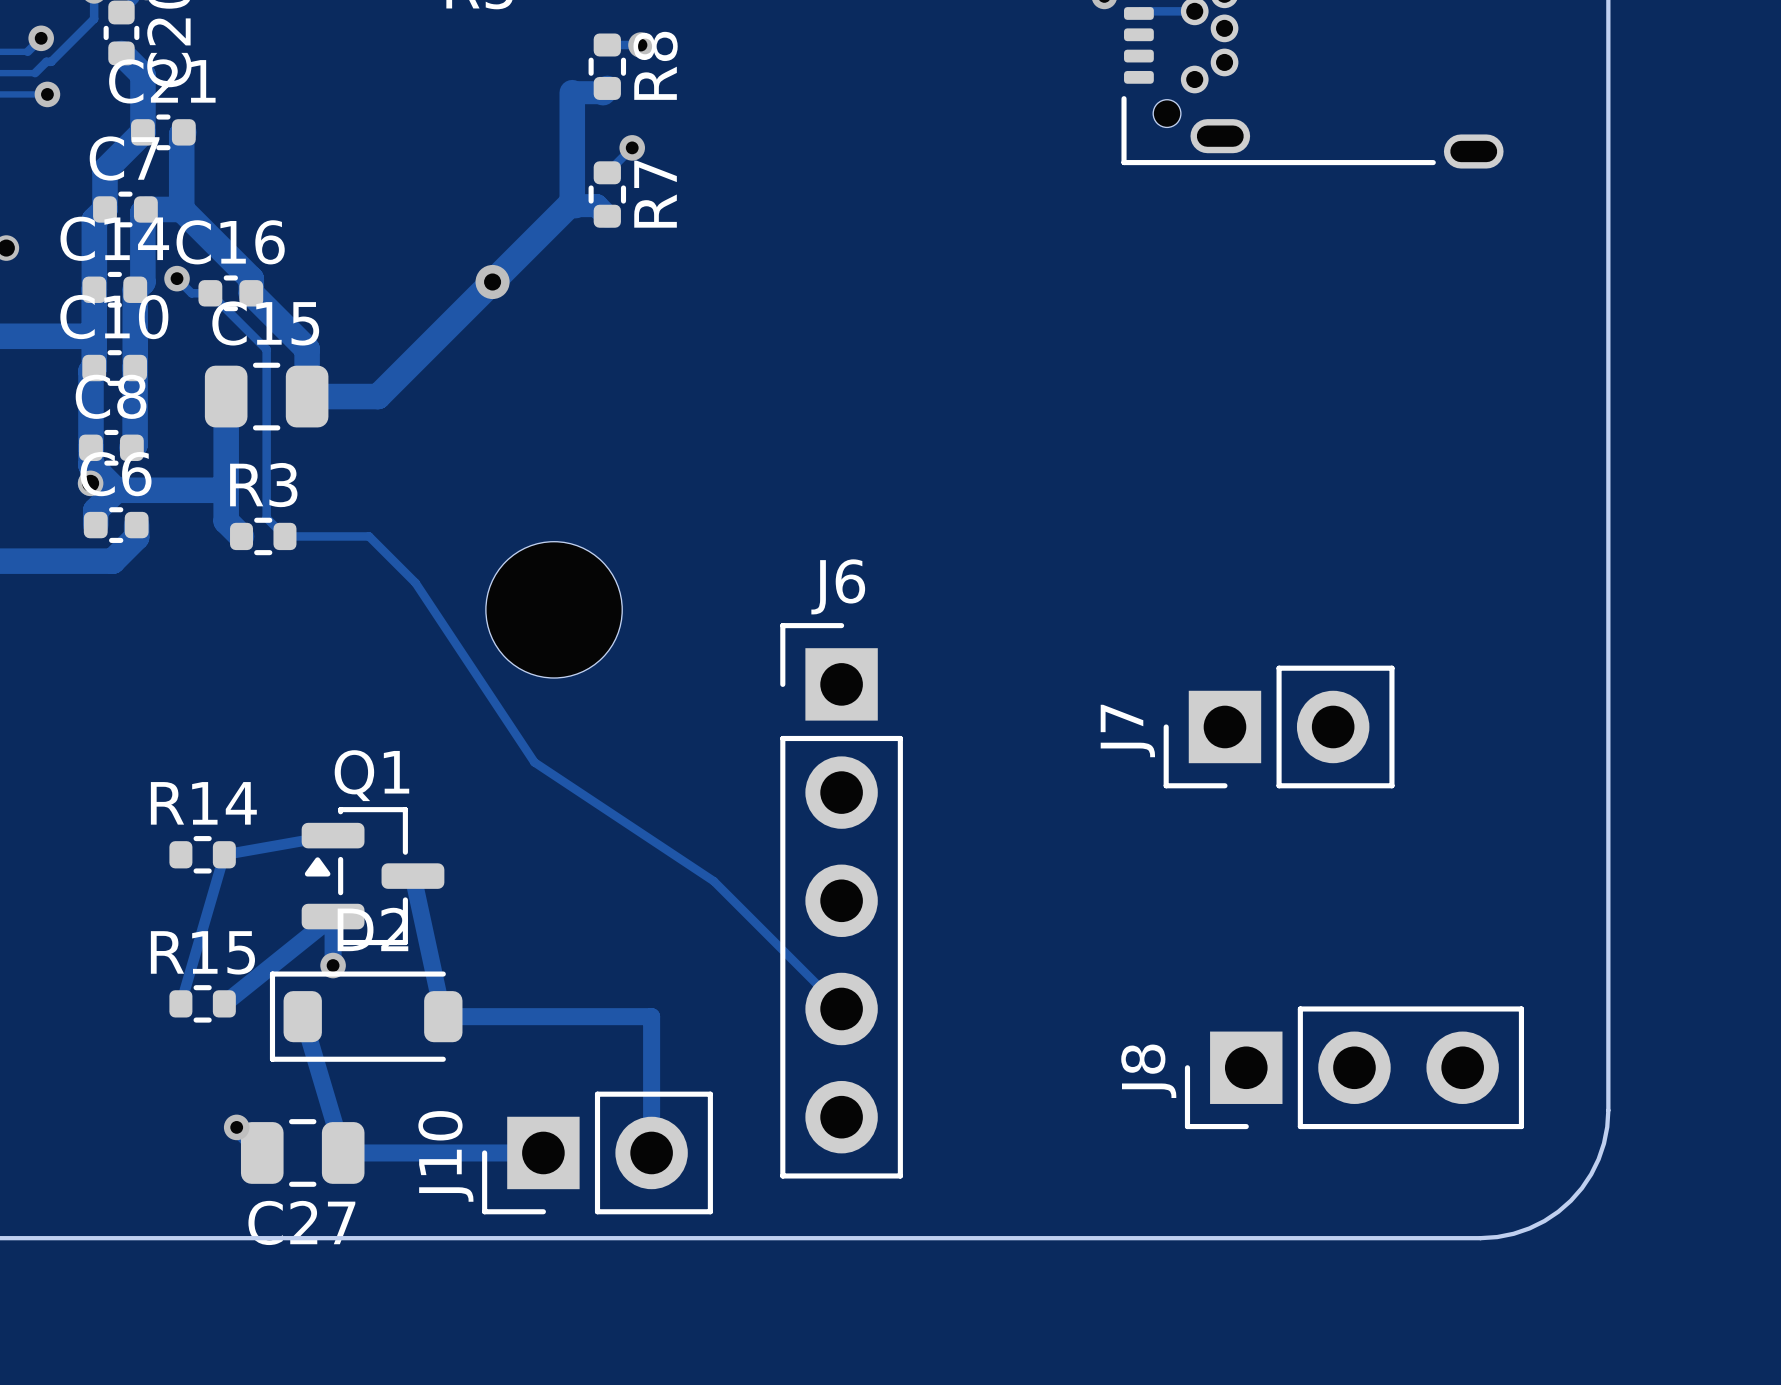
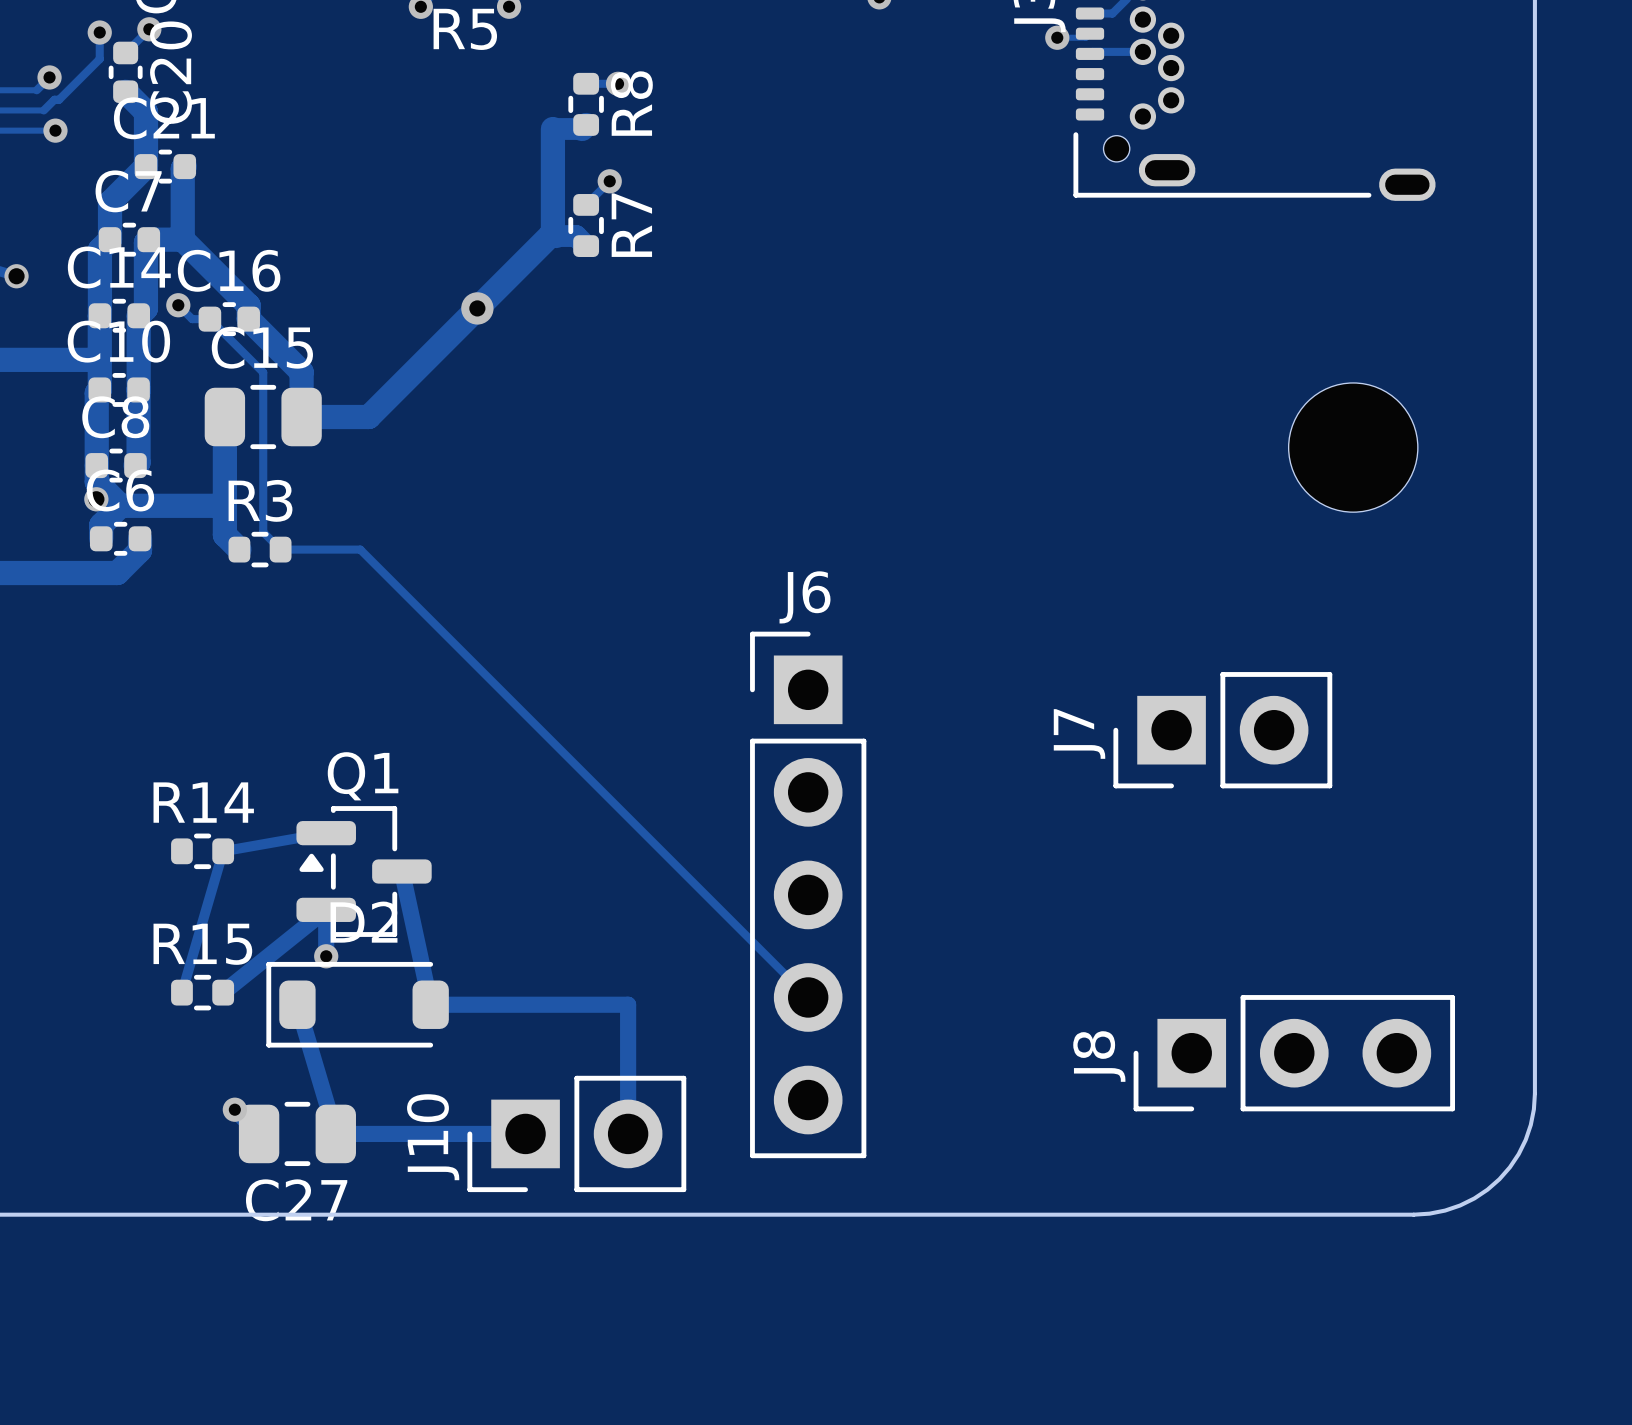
track: (415, 583) (534, 762) (713, 881) -> (404, 593) (687, 876)
part position: (554, 609) -> (1353, 447)

